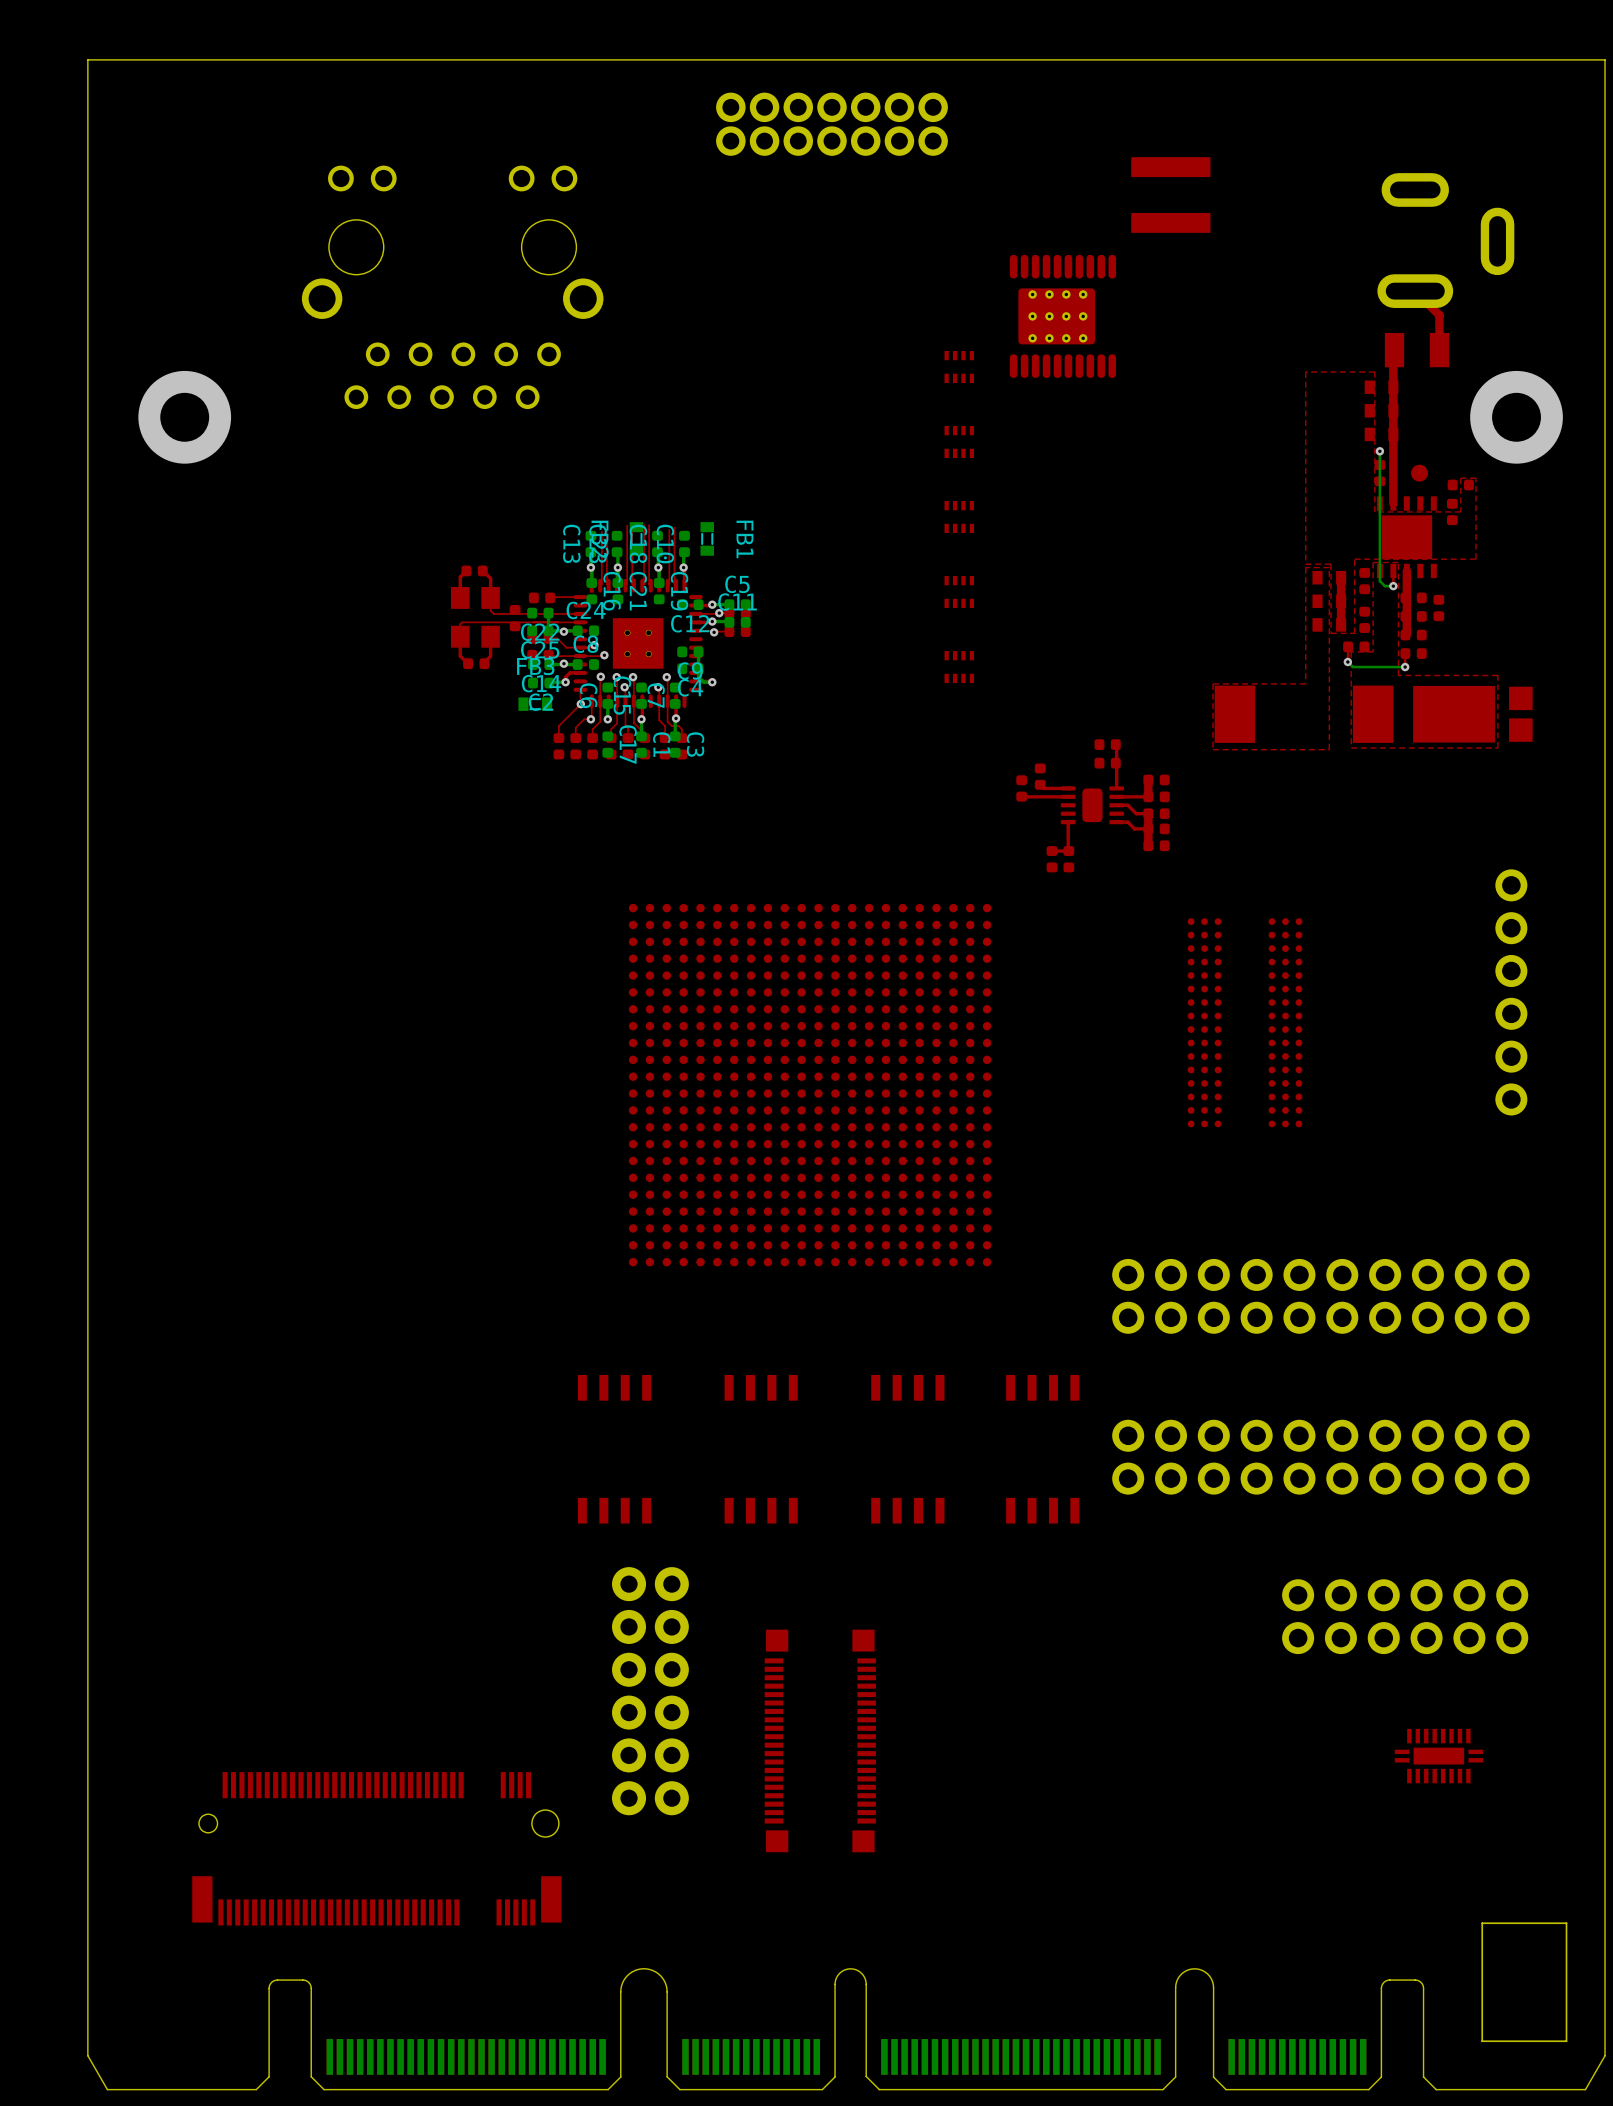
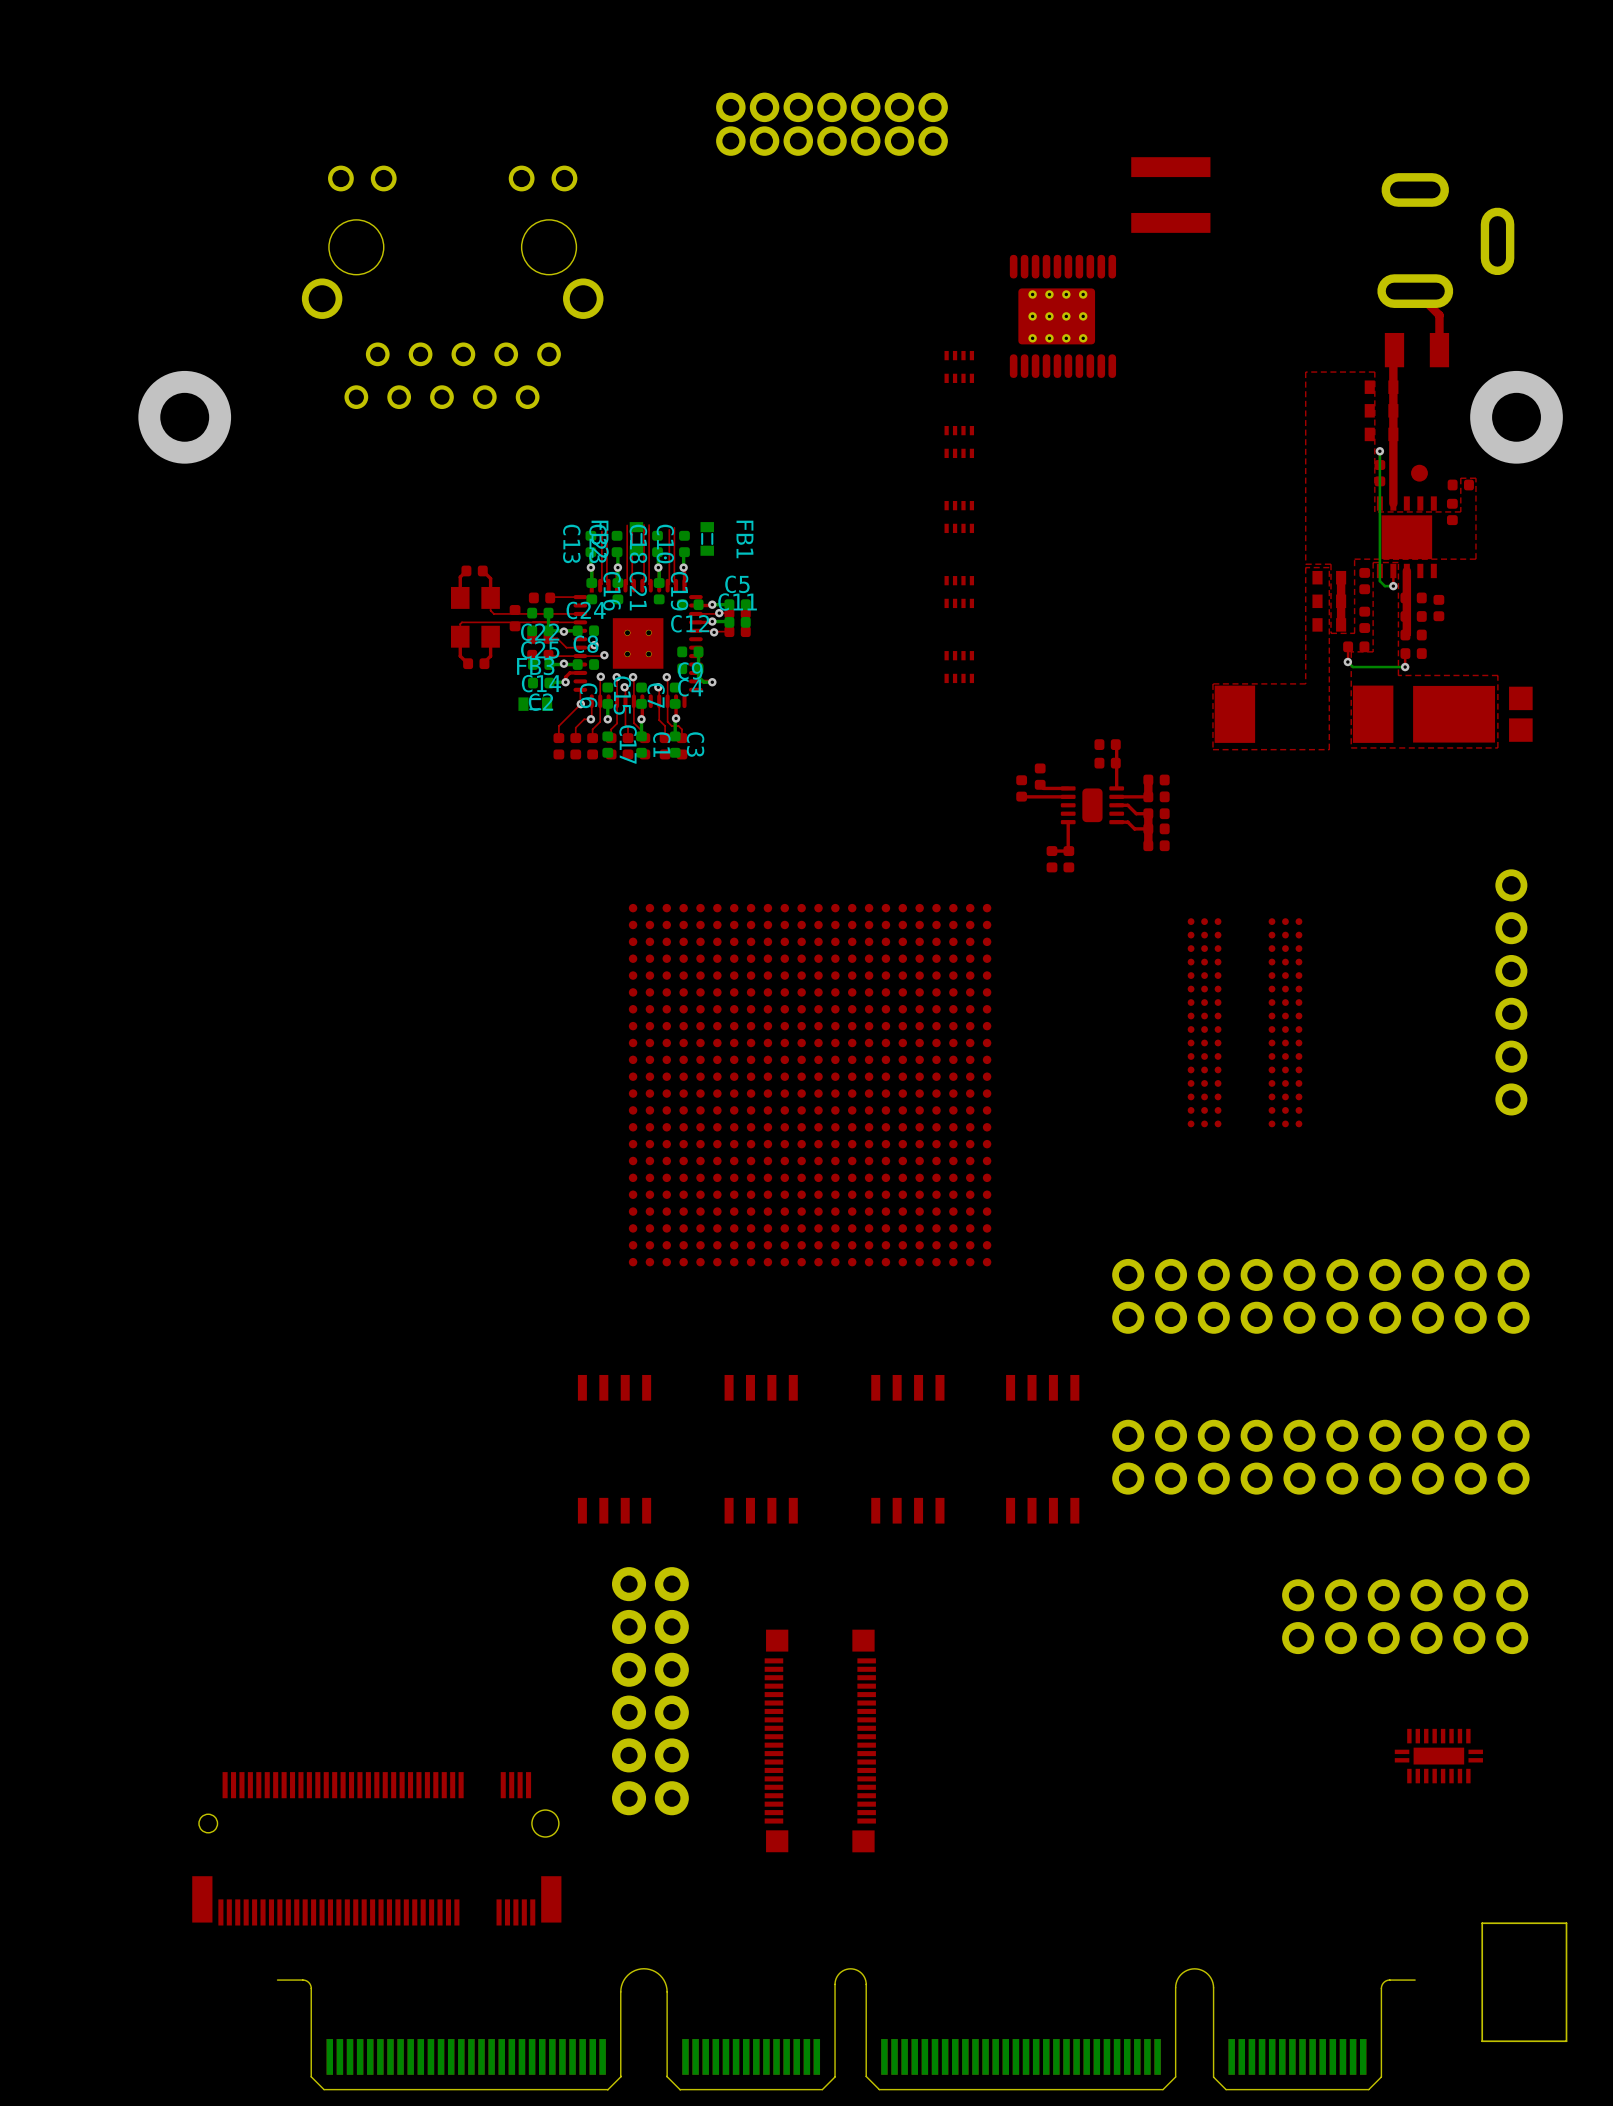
board edge: (1415, 1980) (1421, 1982) (1423, 1987) (1423, 2076) (1436, 2089) (1585, 2089) (1605, 2055) (1605, 59) (87, 59) (87, 2055) (107, 2089) (256, 2089) (269, 2076) (269, 1985) (276, 1980) (302, 1980) -> (277, 1980) (302, 1980)

